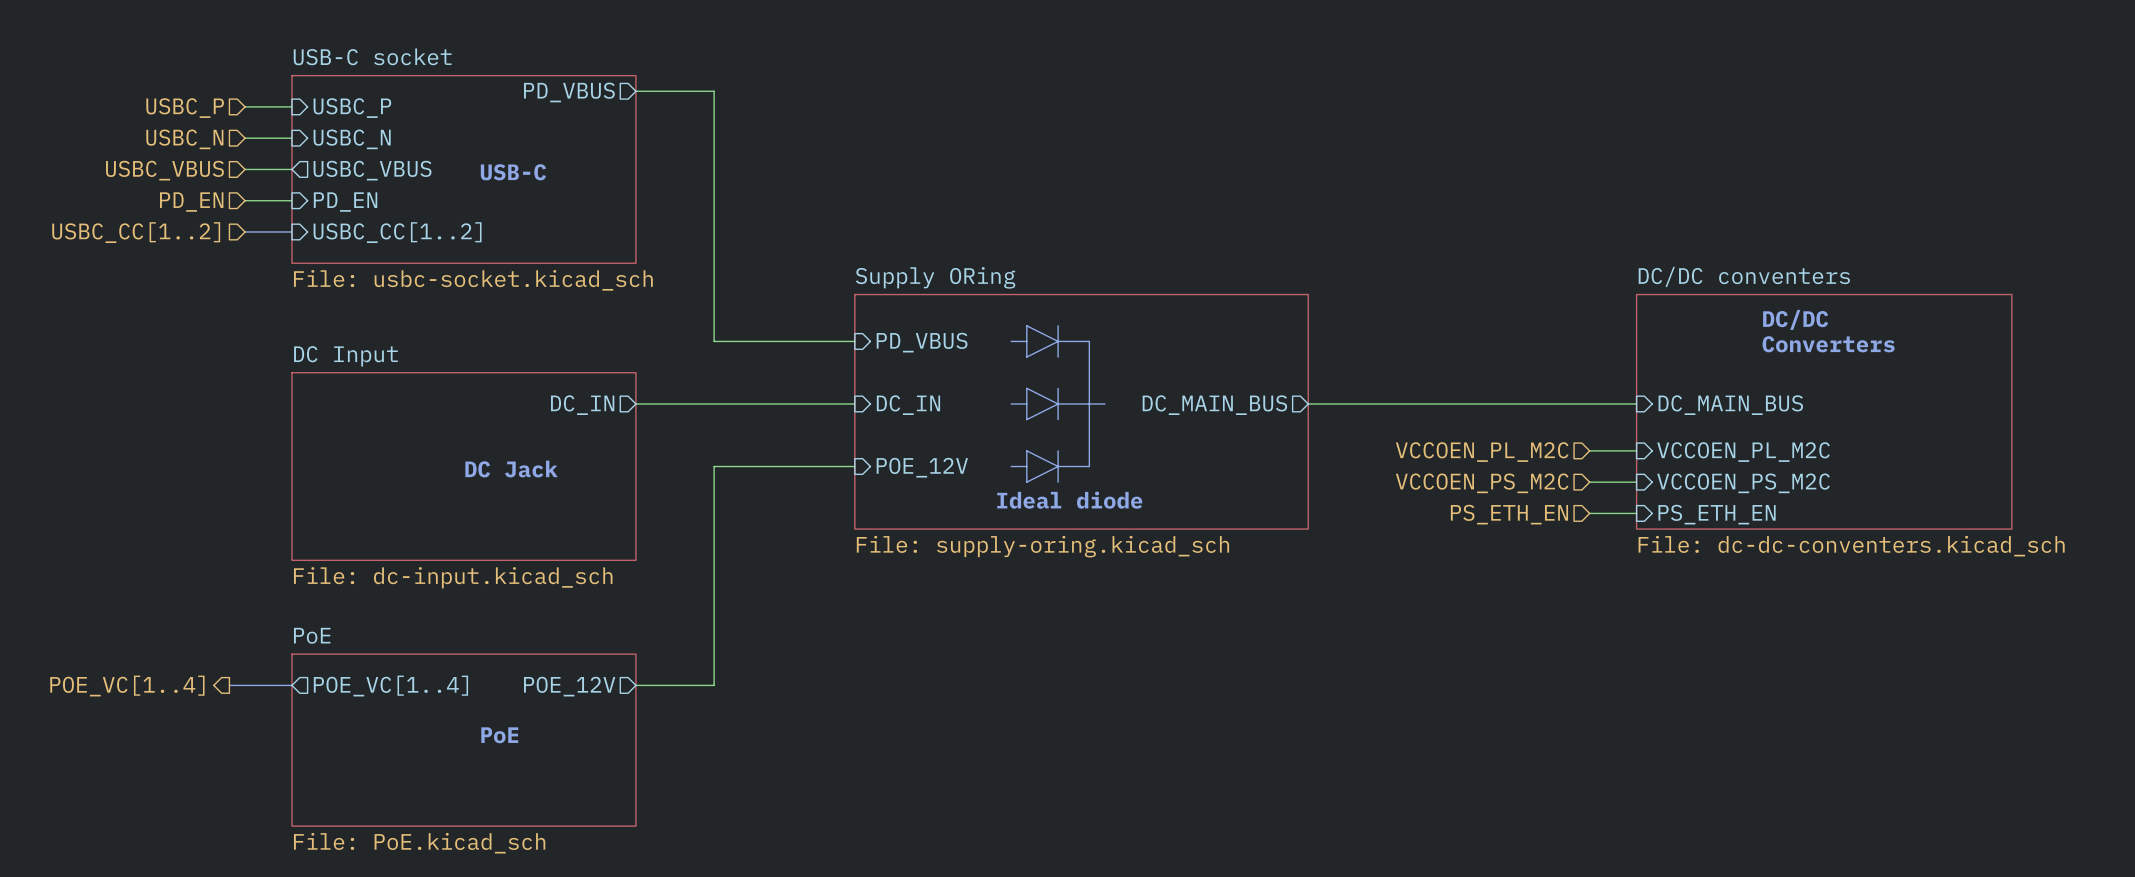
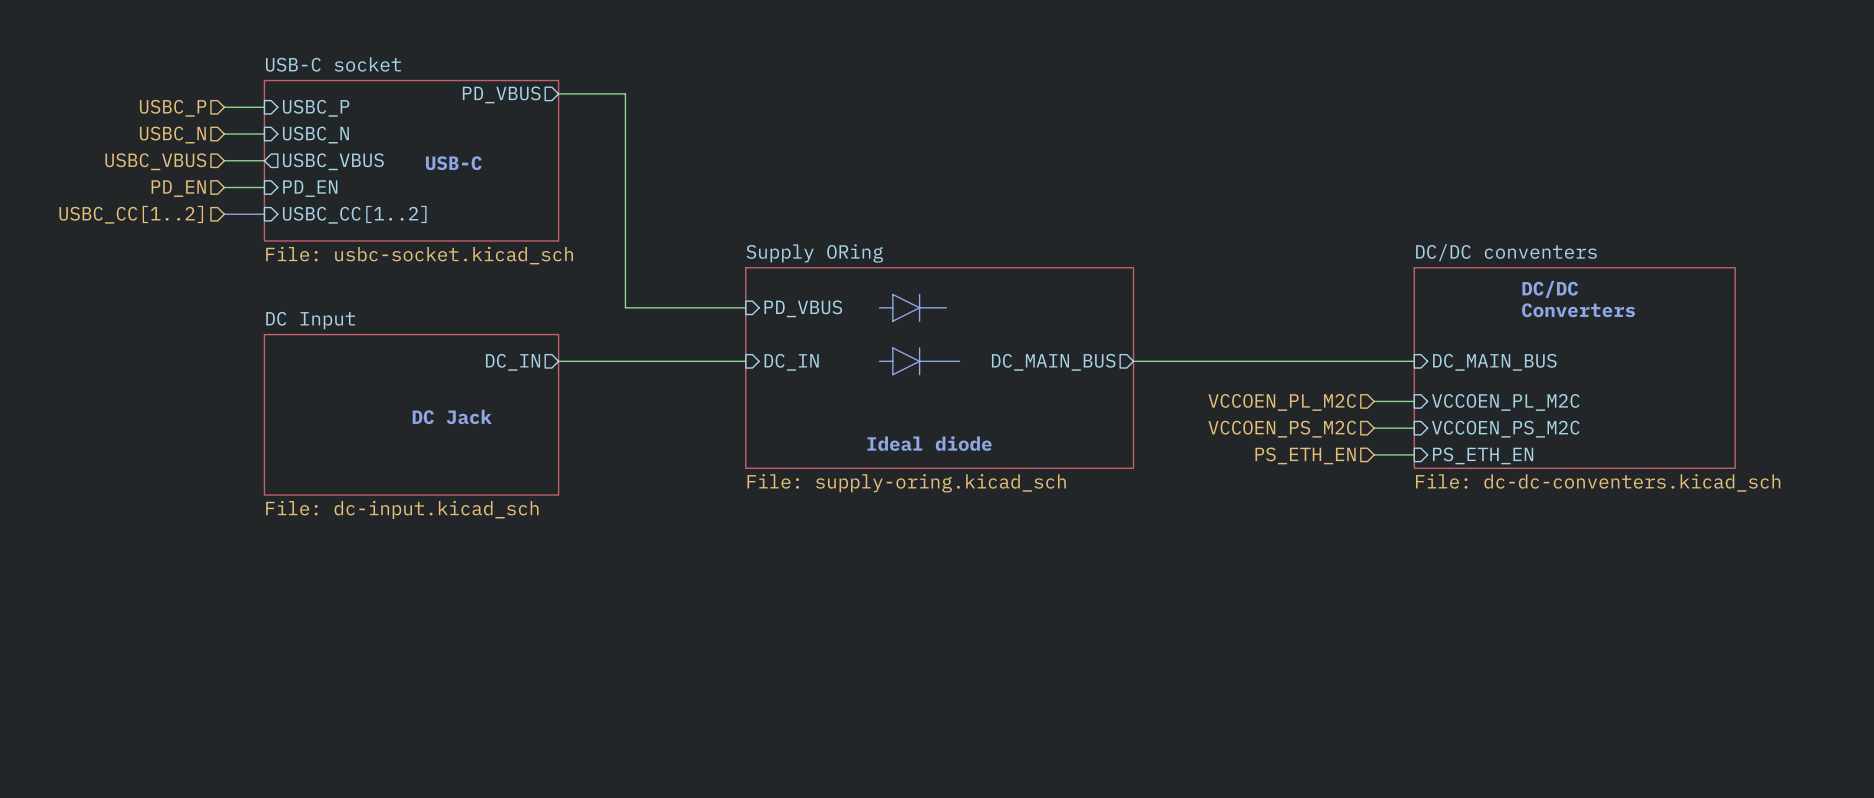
line: (1089, 341) (1089, 466) (1058, 466) -> none
line: (1058, 450) (1058, 482) -> none
wire: (854, 466) (714, 466) (714, 685) (635, 685) -> none
line: (1011, 466) (1026, 466) -> none
line: (1058, 466) (1026, 450) (1026, 482) (1058, 466) -> none
sheet pin: POE_12V (922, 467) -> none
bus: (229, 685) (291, 685) -> none
hierarchical label: POE_VC[1..4] (127, 686) -> none
sheet pin: POE_VC[1..4] (390, 686) -> none
sheet pin: POE_12V (569, 686) -> none
text: PoE (499, 735) -> none
sheet PoE: File: PoE.kicad_sch (463, 740) -> none

